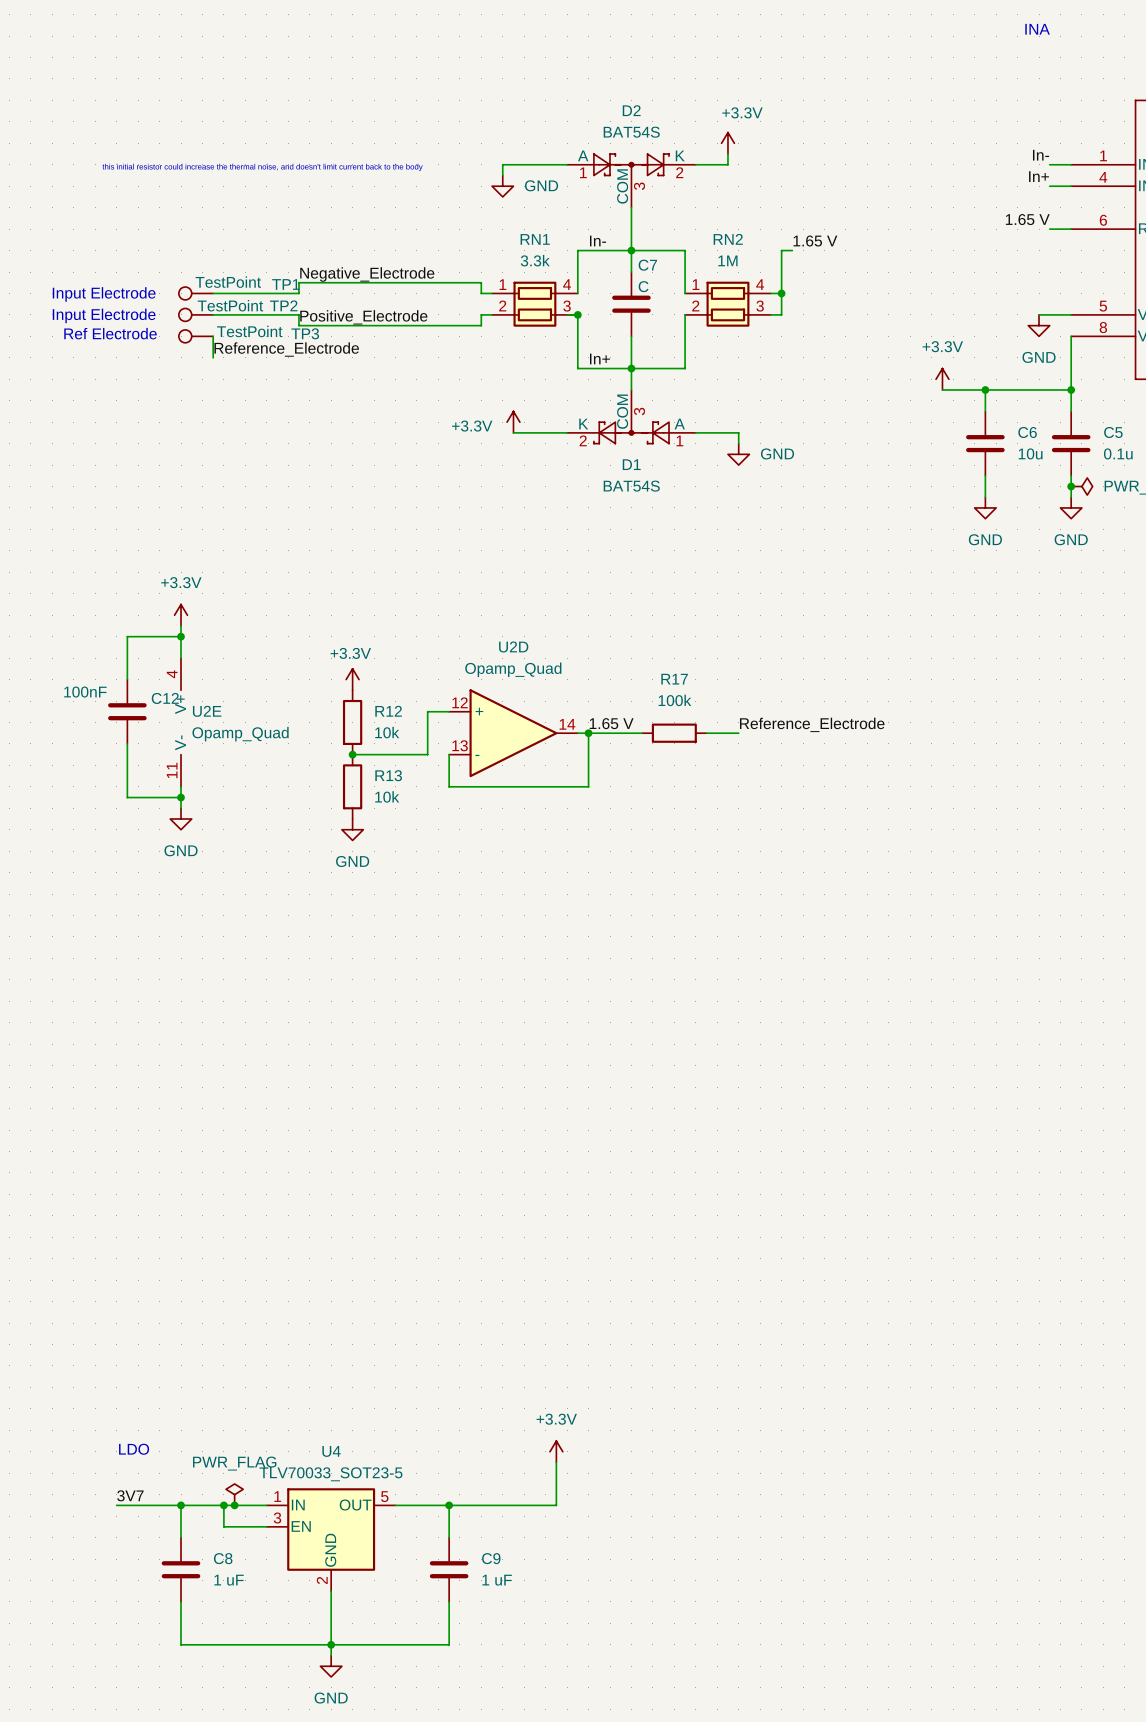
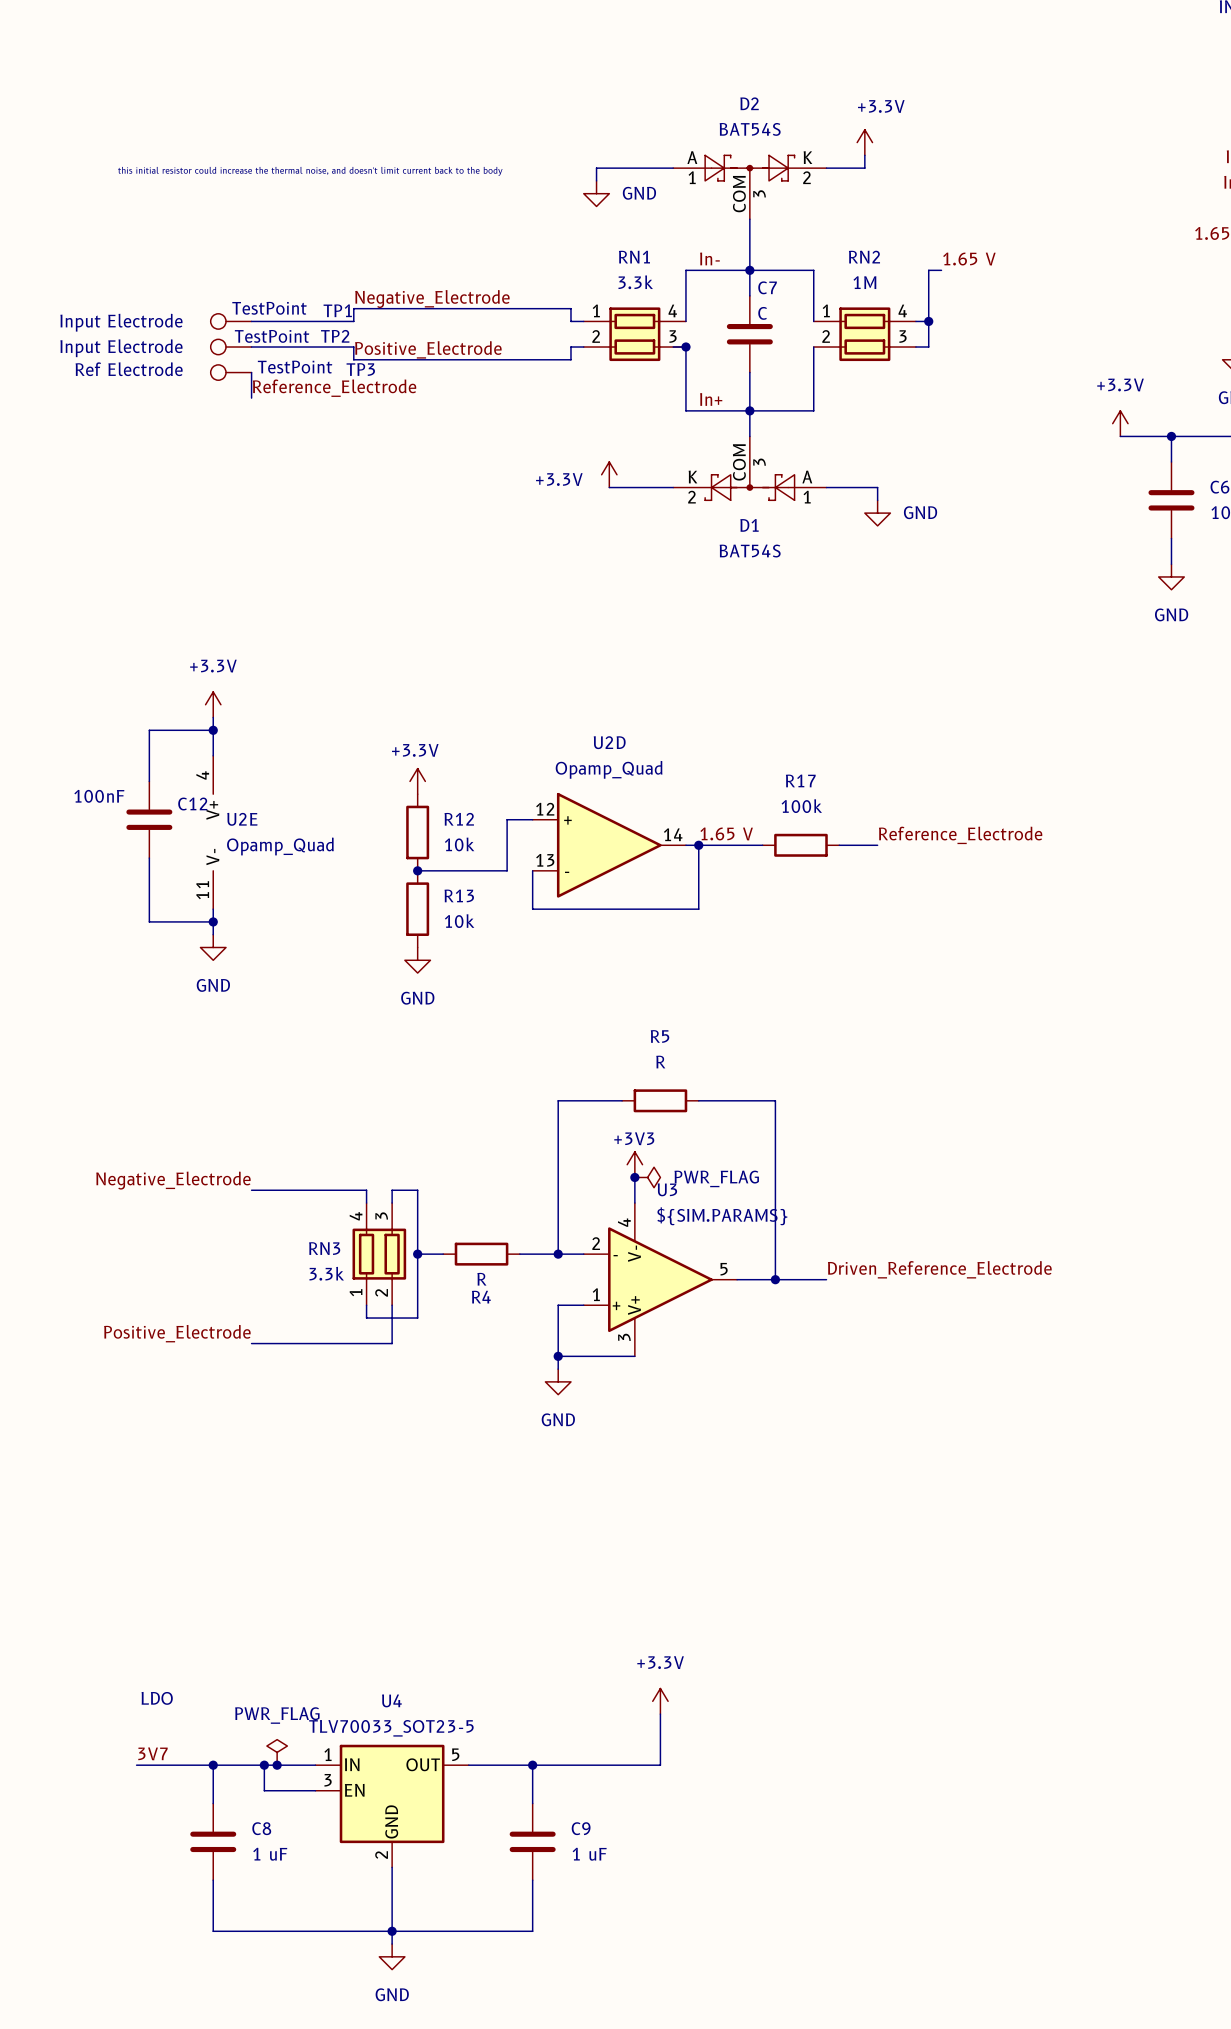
wire: none -> (622, 1100) (558, 1100) (558, 1254)
R5: none -> R (660, 1100)
wire: none -> (698, 1100) (775, 1100) (775, 1279)
power symbol: none -> +3V3 (634, 1164)
wire: none -> (634, 1177) (634, 1203)
junction: none -> (634, 1177)
power symbol: none -> PWR_FLAG (647, 1177)
label: none -> Negative_Electrode (173, 1180)
wire: none -> (251, 1190) (366, 1190) (366, 1203)
wire: none -> (392, 1203) (392, 1190) (417, 1190) (417, 1318) (366, 1318) (366, 1305)
RN3: none -> 3.3k (379, 1254)
wire: none -> (417, 1254) (443, 1254)
junction: none -> (417, 1254)
R4: none -> R (481, 1254)
wire: none -> (519, 1254) (583, 1254)
junction: none -> (558, 1254)
label: none -> Driven_Reference_Electrode (939, 1269)
U3: none -> ${SIM.PARAMS} (660, 1279)
wire: none -> (737, 1279) (826, 1279)
junction: none -> (775, 1279)
wire: none -> (392, 1305) (392, 1343) (251, 1343)
wire: none -> (583, 1305) (558, 1305) (558, 1369)
label: none -> Positive_Electrode (177, 1333)
wire: none -> (558, 1356) (634, 1356)
junction: none -> (558, 1356)
power symbol: none -> GND (558, 1381)

